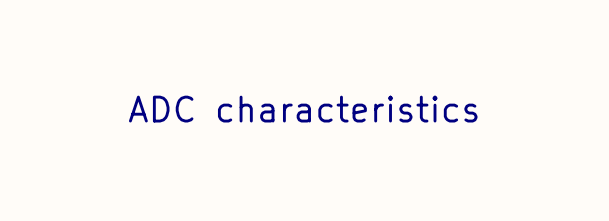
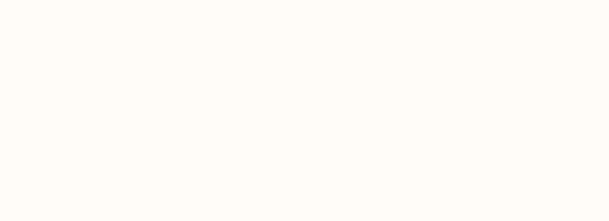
text: ADC characteristics (303, 109) -> none

